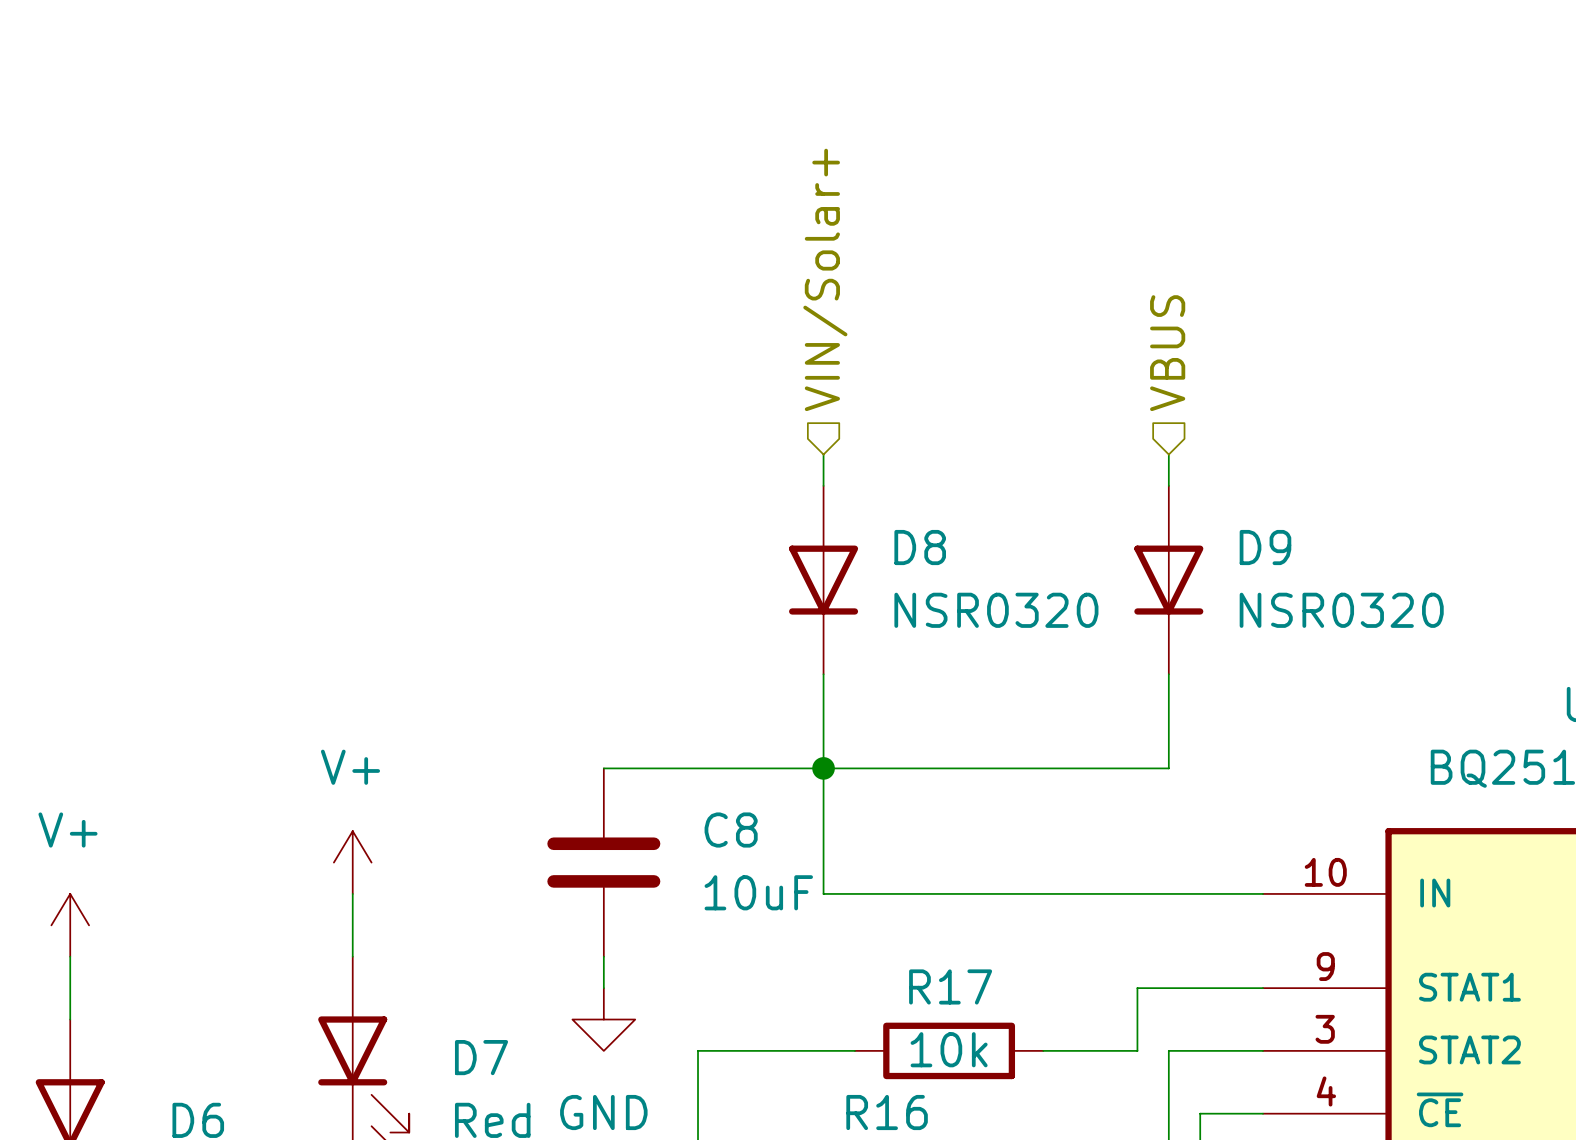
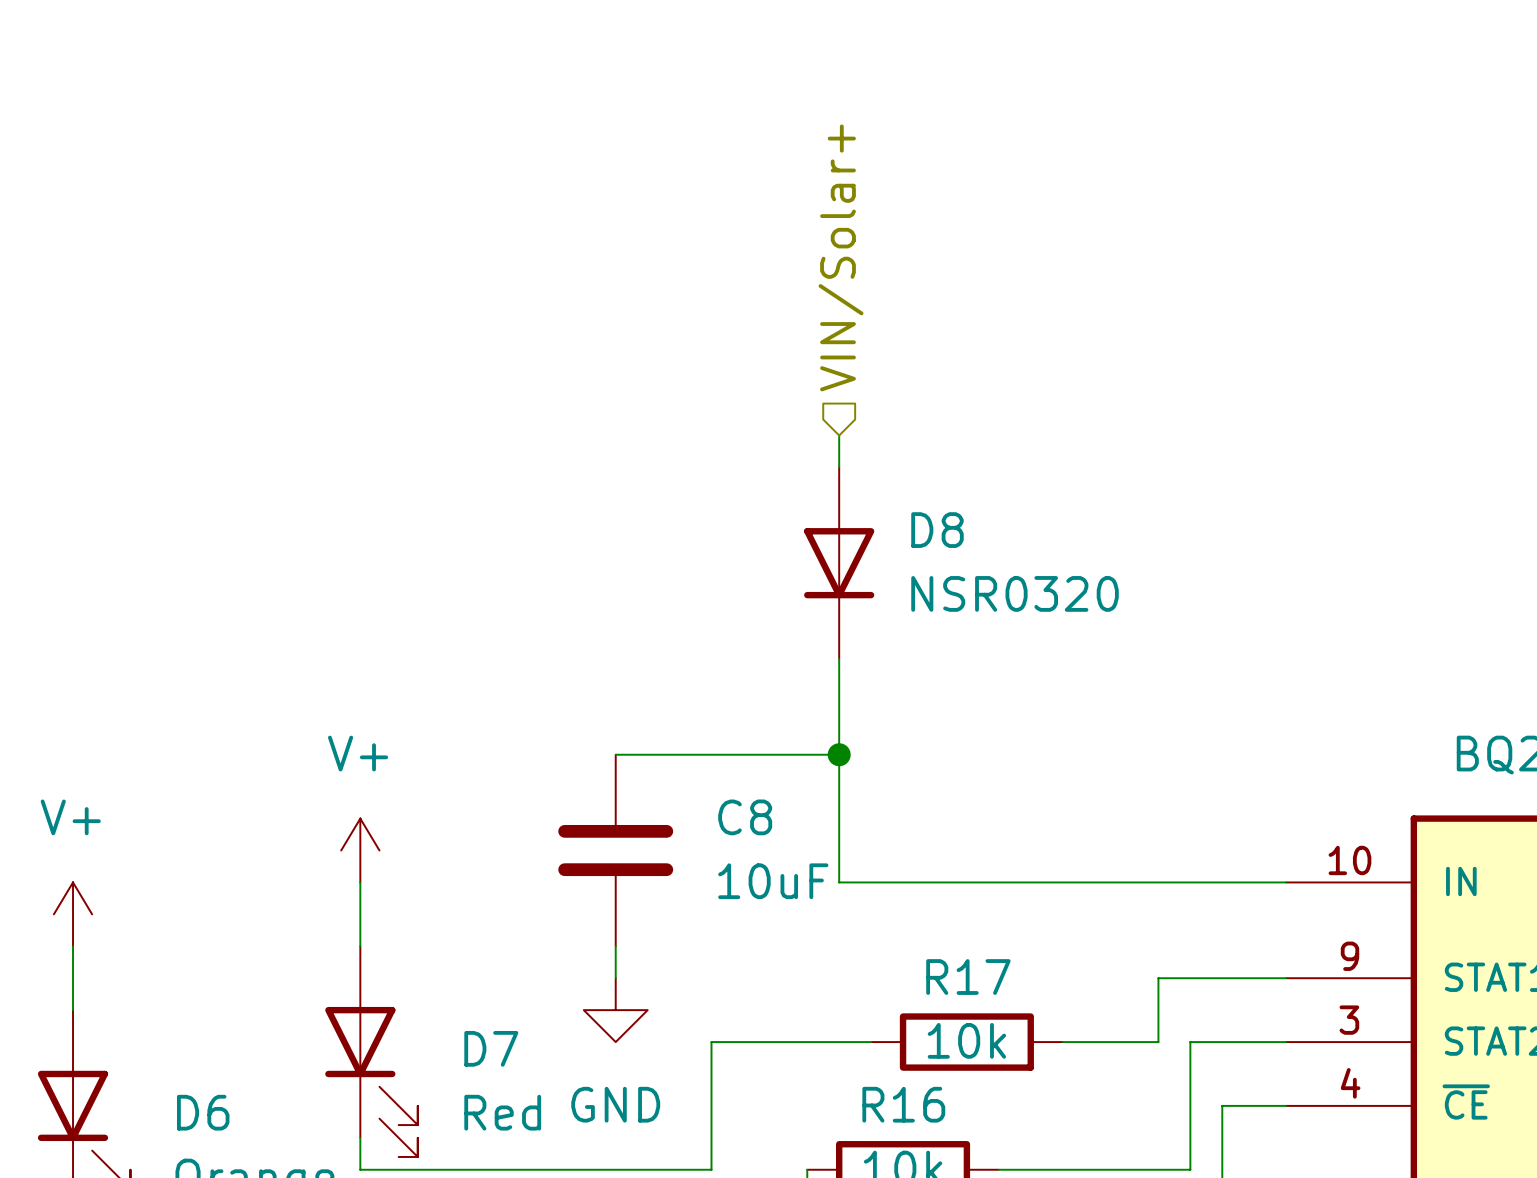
hierarchical label: VBUS (1167, 353) -> none
wire: (1168, 454) (1168, 485) -> none
D9: NSR0320 (1168, 580) -> none
wire: (1168, 674) (1168, 768) (823, 768) -> none

